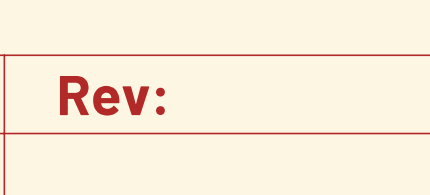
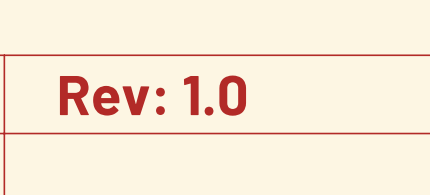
title block: Rev: (112, 95) -> Rev: 1.0 (152, 95)

